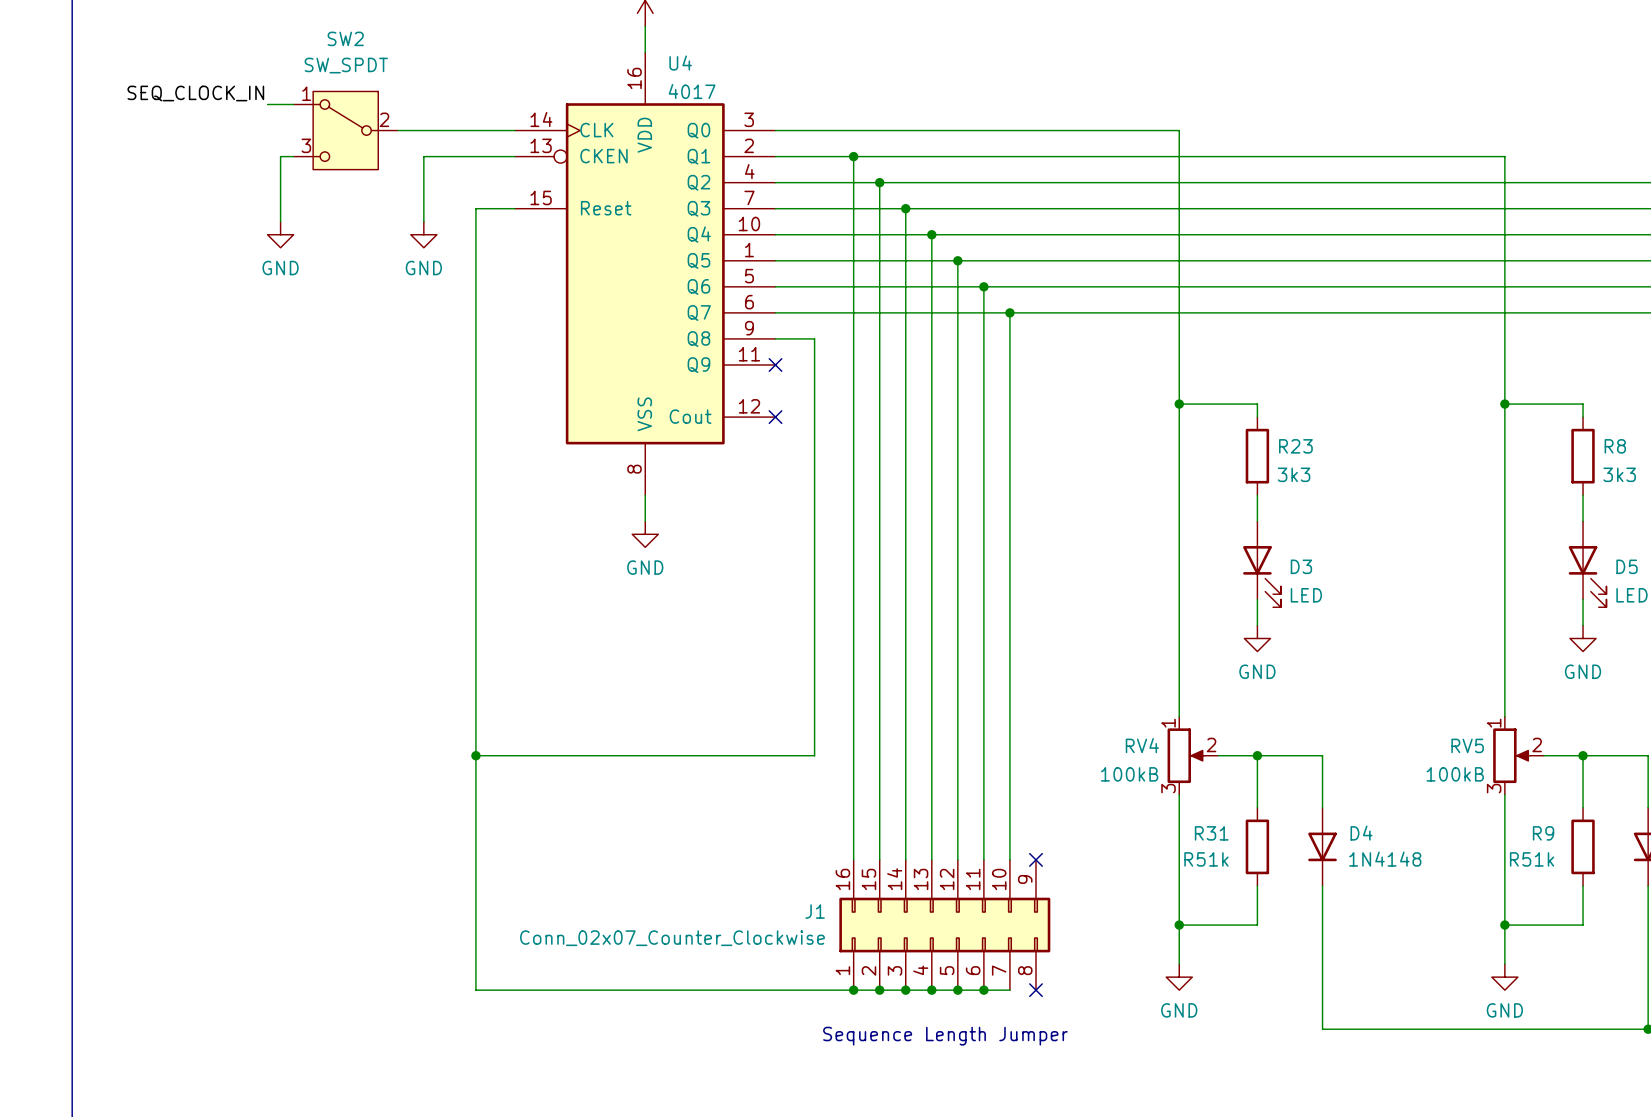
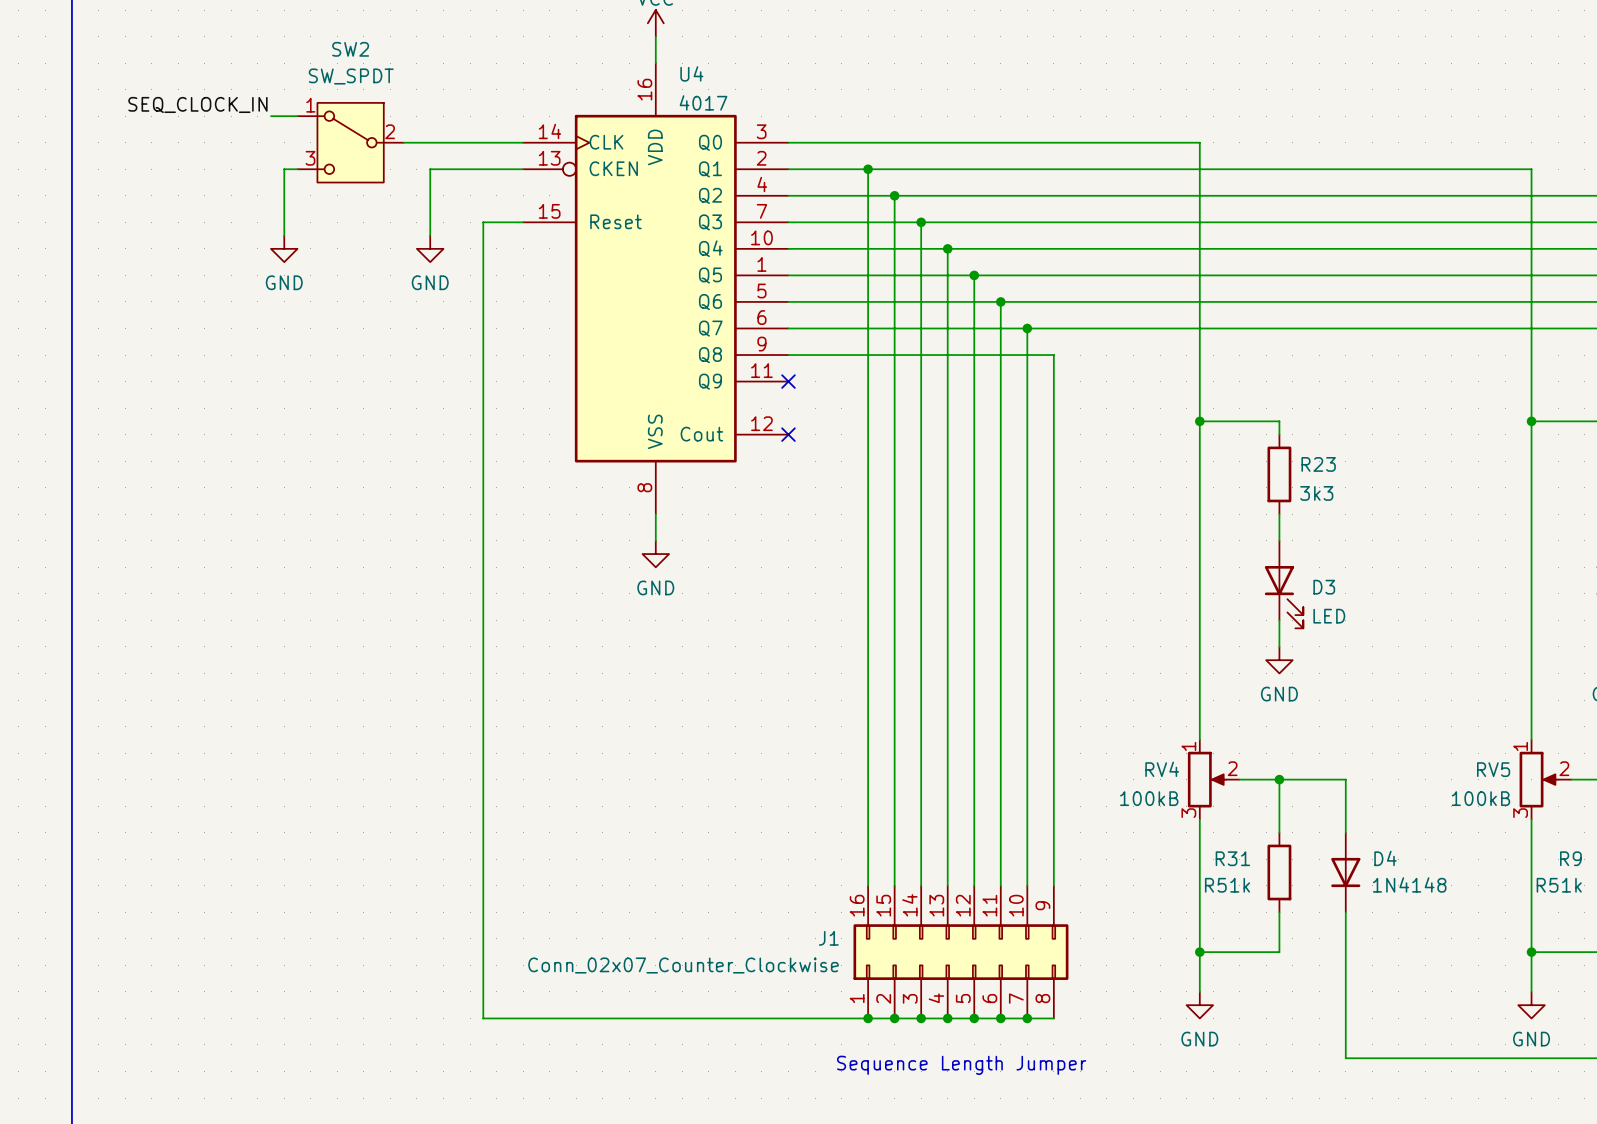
wire: (814, 338) (814, 755) (475, 755) -> (828, 355) (1053, 355) (1053, 885)
junction: (475, 755) -> none
no-connect mark: (1035, 859) -> none
wire: none -> (1027, 1018) (1053, 1018)
junction: none -> (1027, 1018)
no-connect mark: (1035, 990) -> none

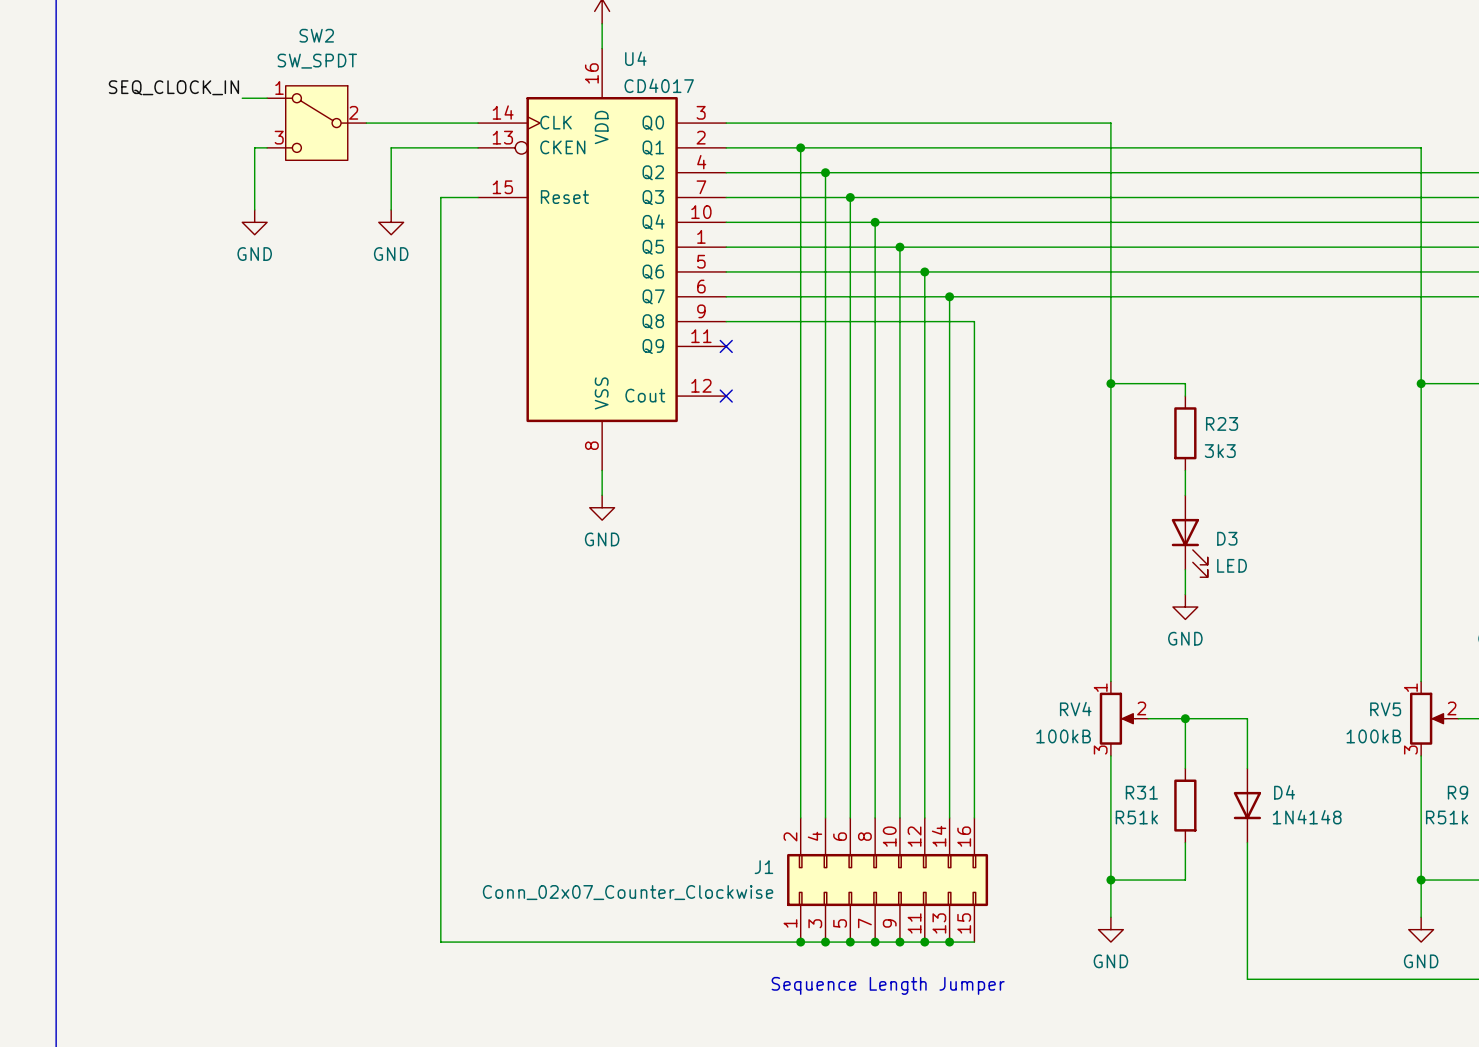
U4 value: 4017 (703, 102) -> CD4017 (659, 85)
J1 symbol: [853, 885, 1069, 1019] -> [787, 817, 989, 943]

